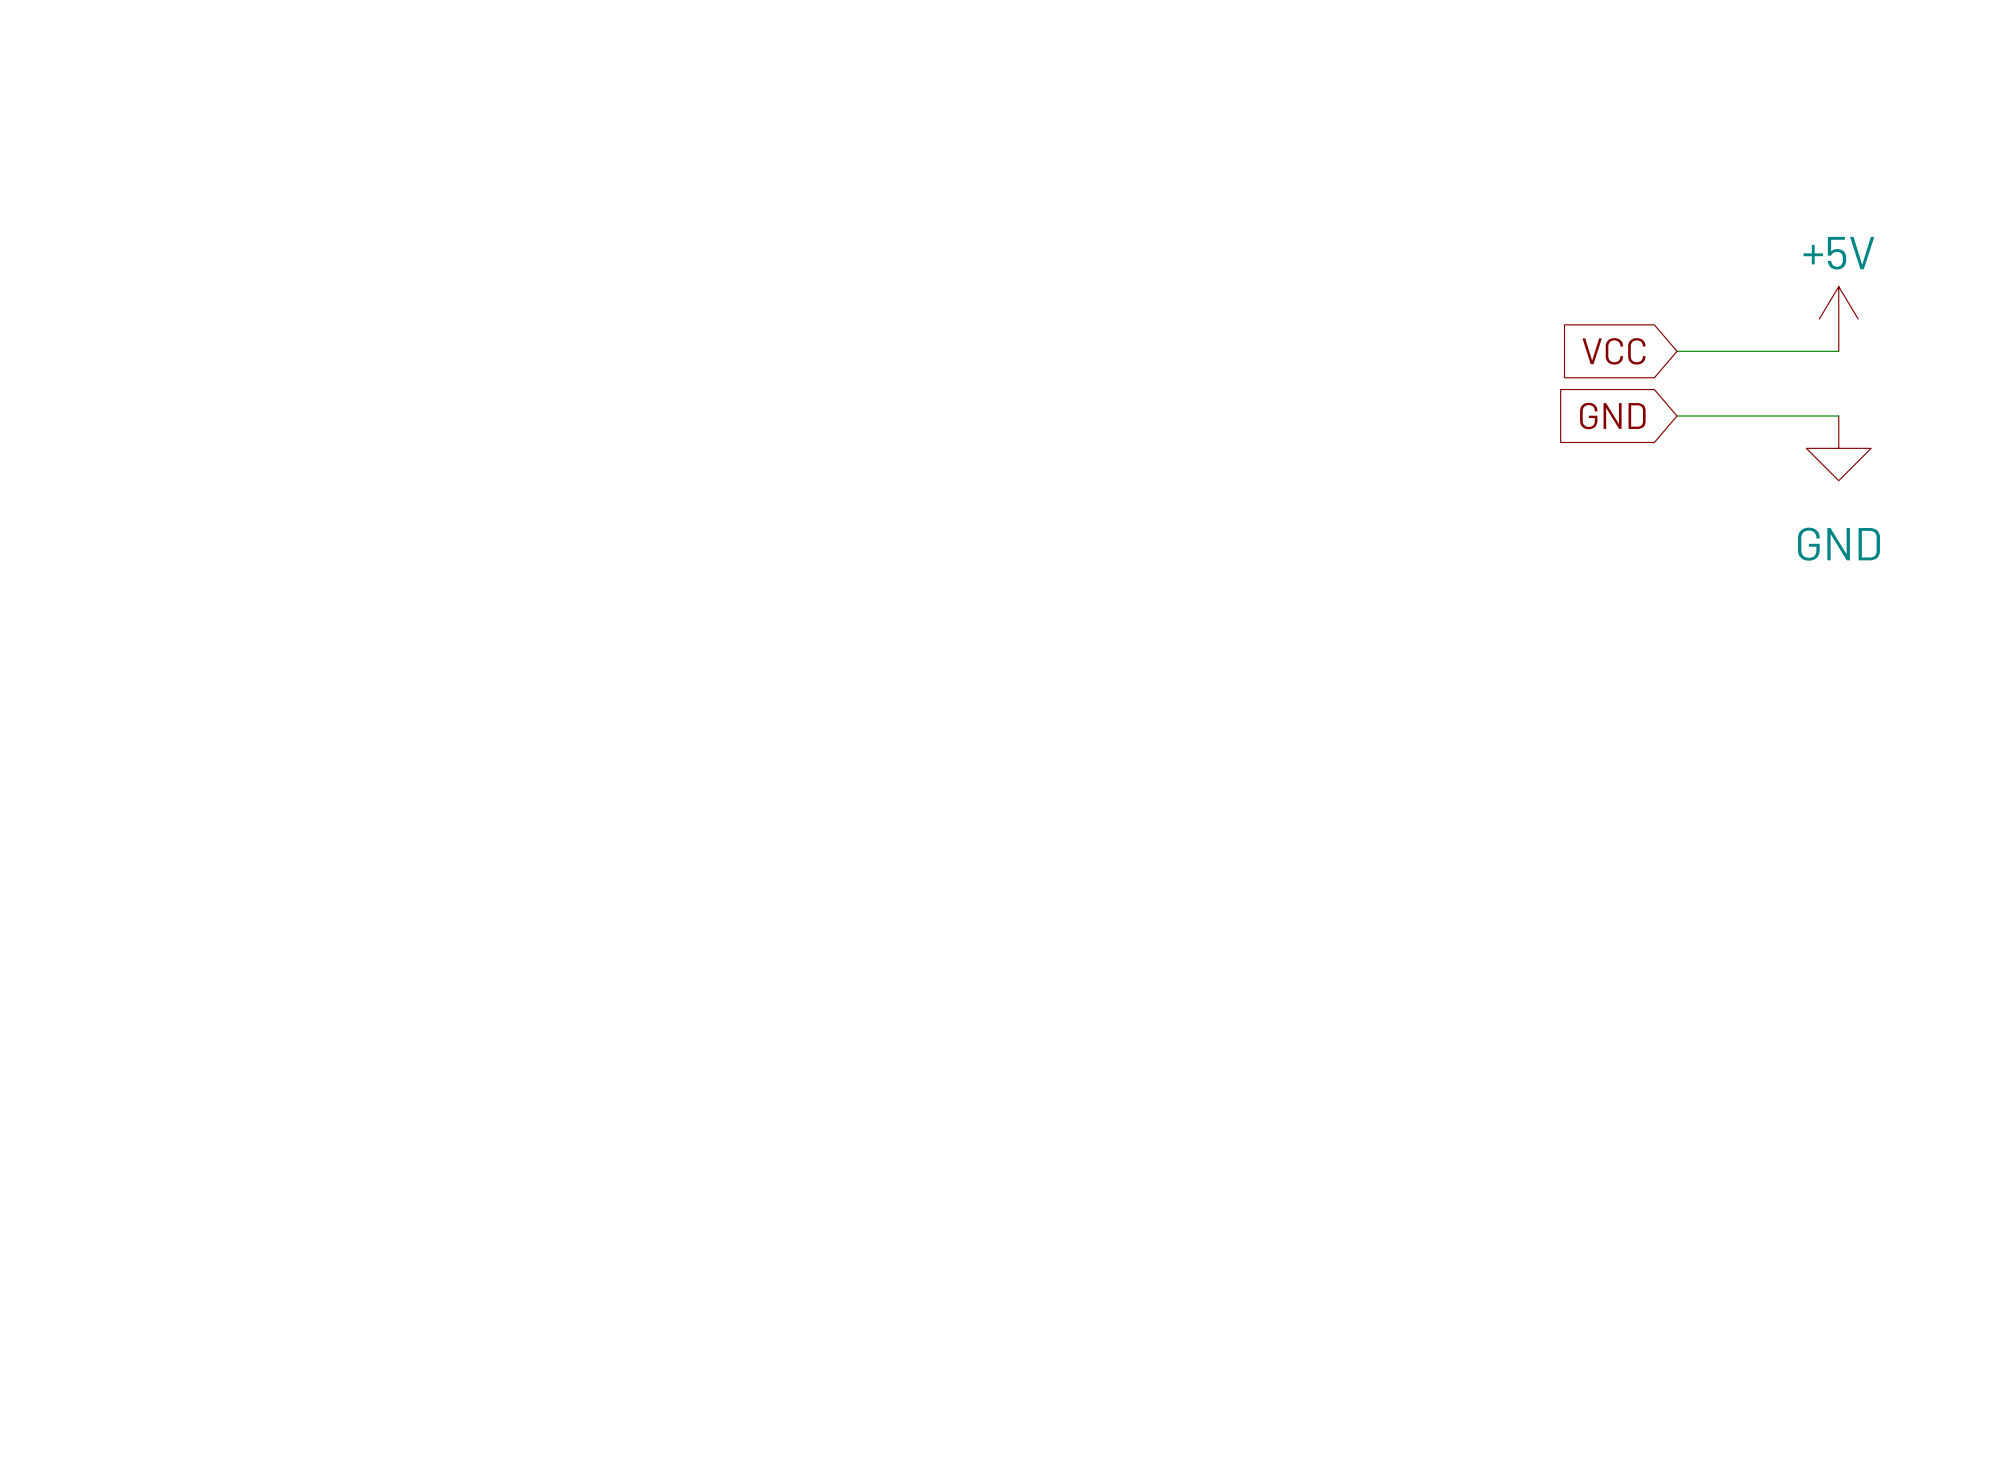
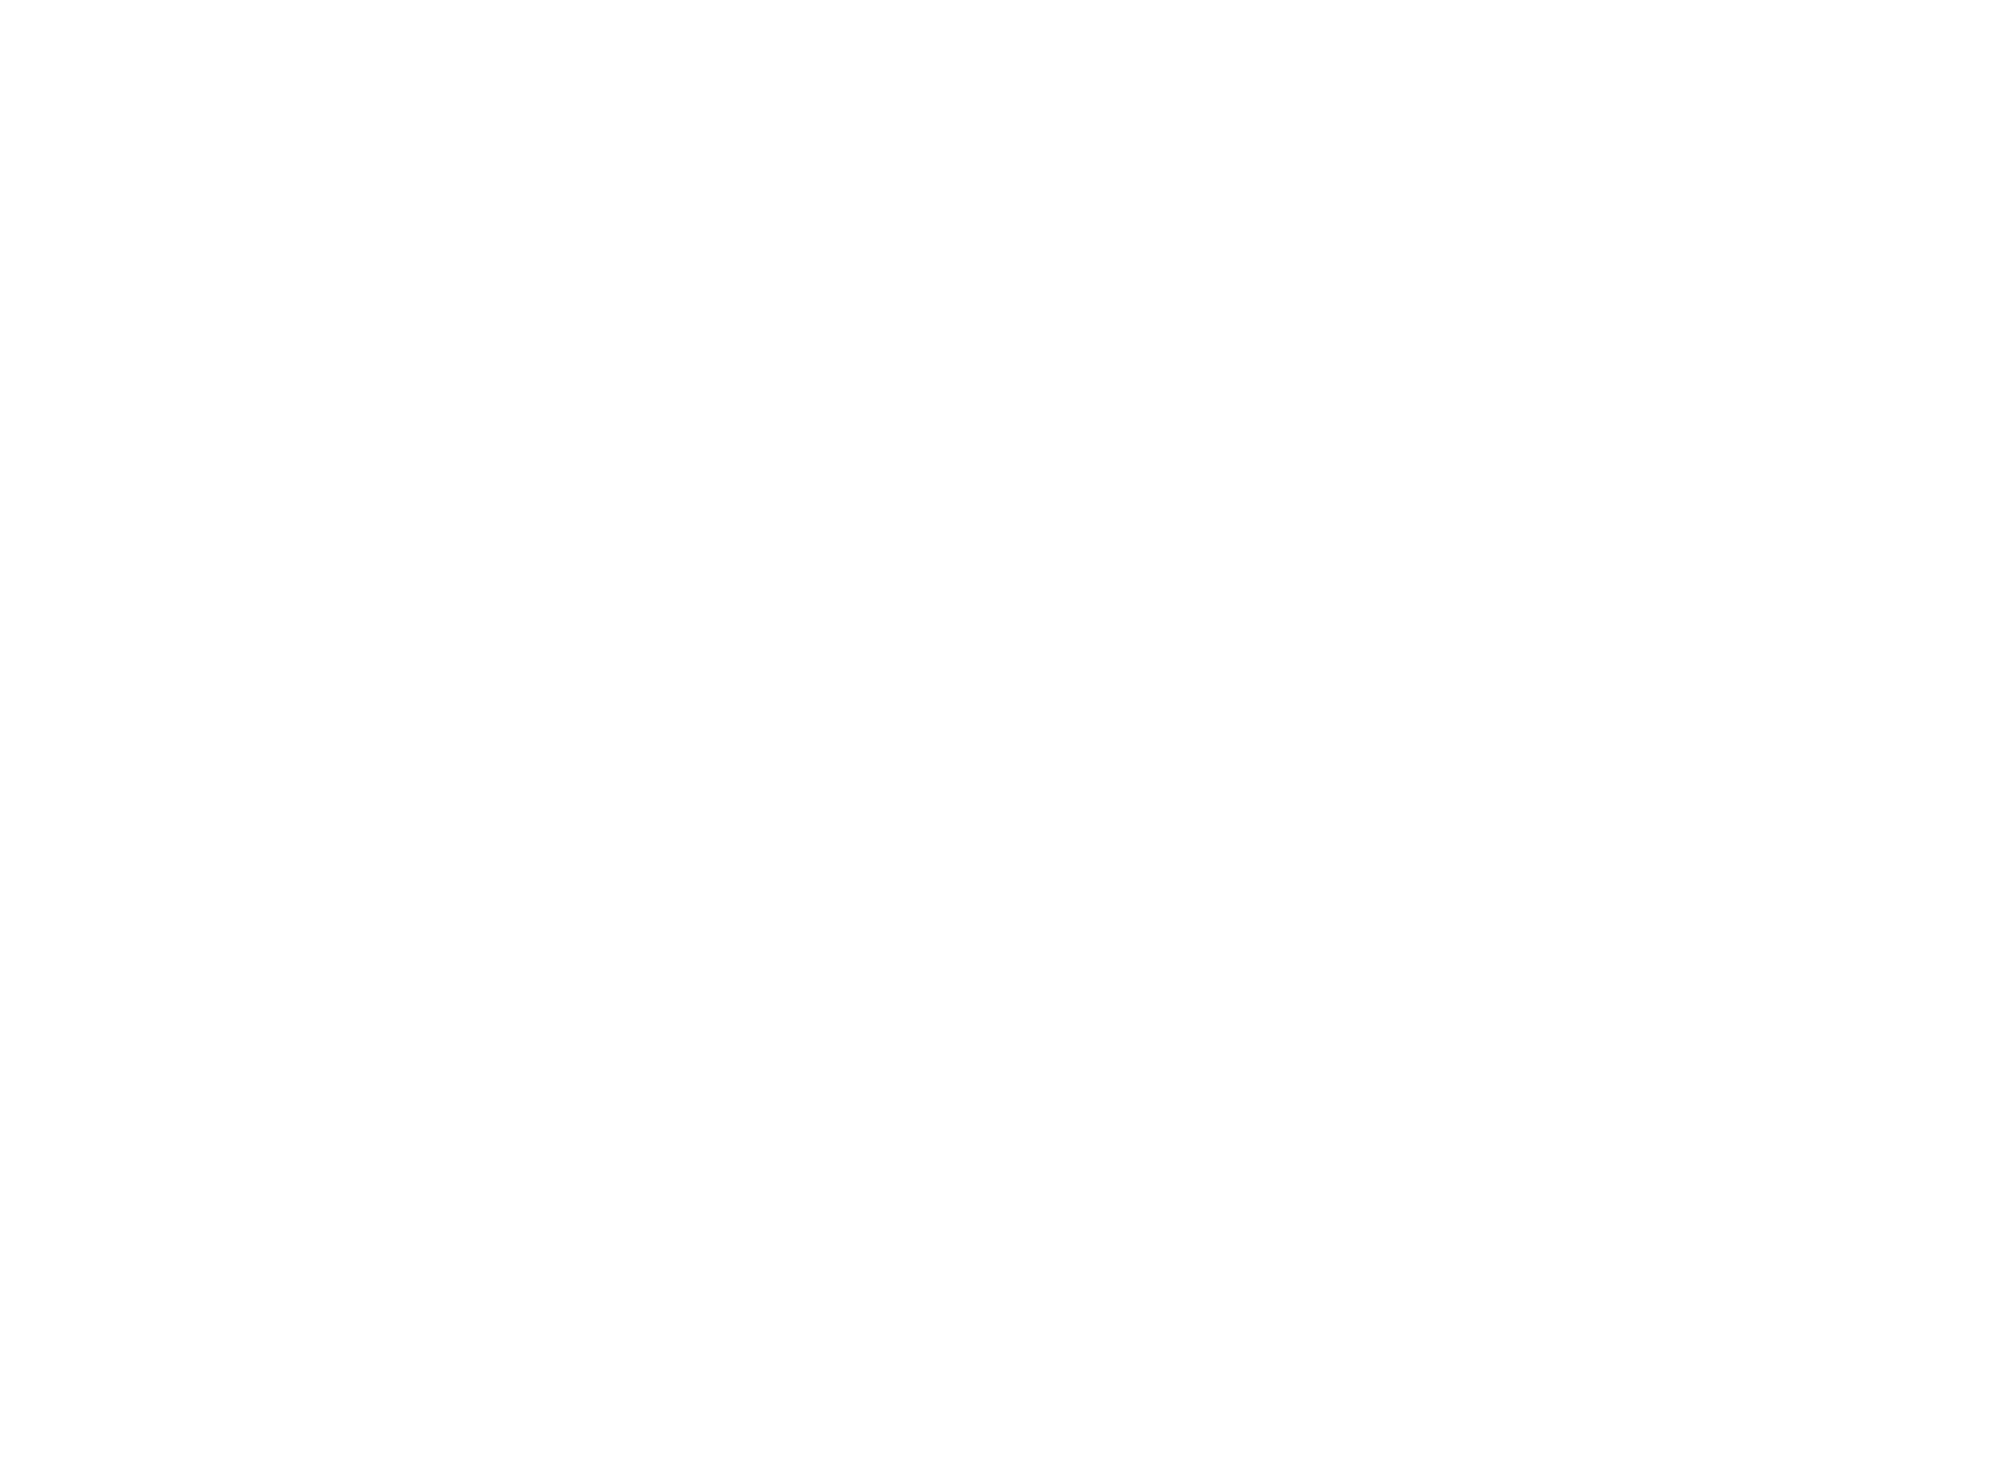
power symbol: +5V (1838, 318) -> none
global label: VCC (1614, 351) -> none
wire: (1677, 351) (1838, 351) -> none
global label: GND (1612, 416) -> none
wire: (1677, 416) (1838, 416) -> none
power symbol: GND (1838, 448) -> none

